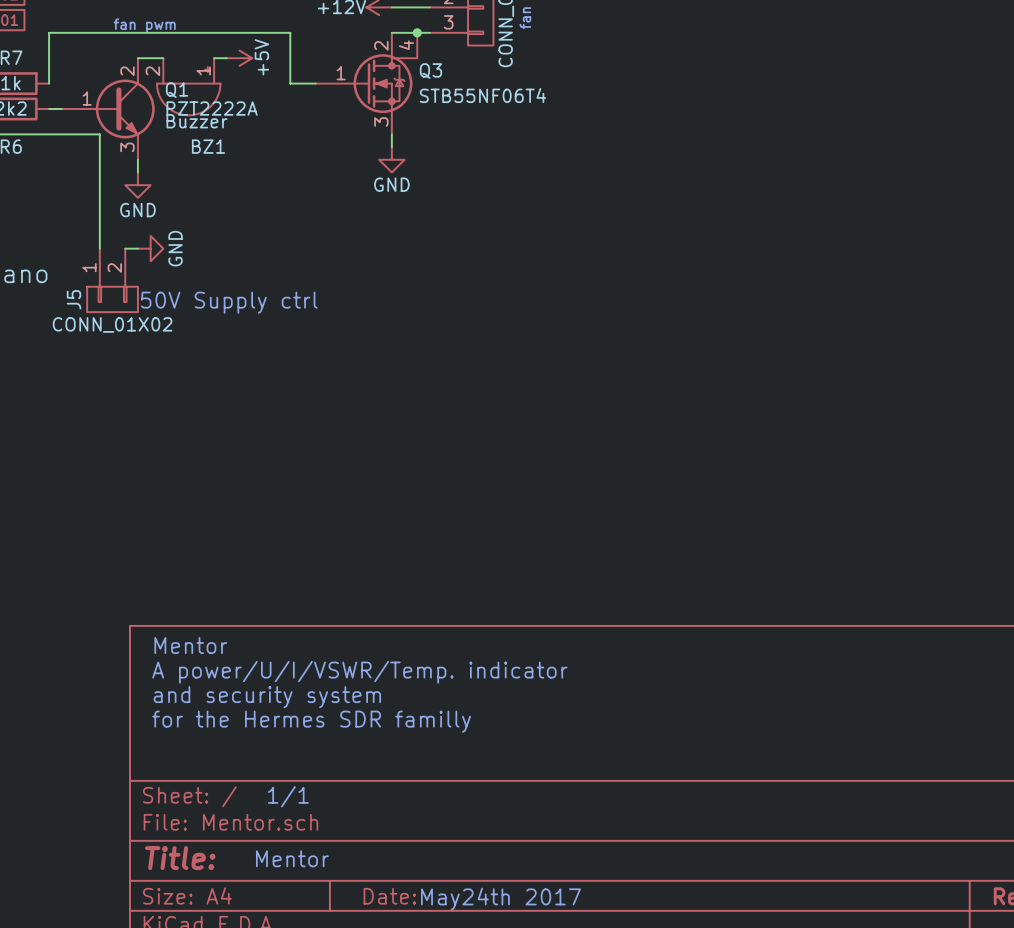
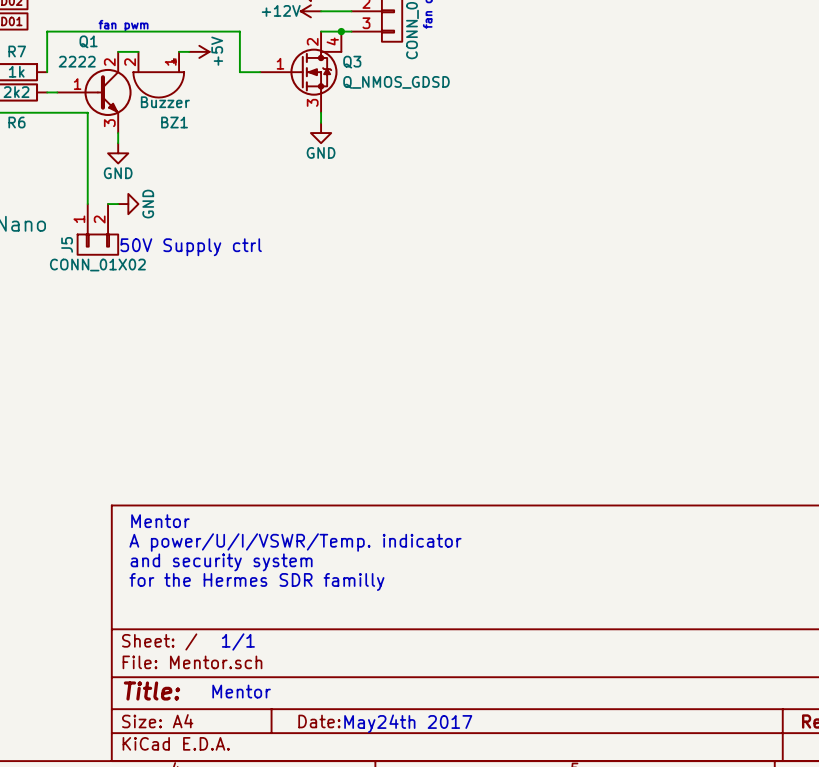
Q1 name position: Q1 (177, 90) -> Q1 (88, 41)
Q3 value: STB55NF06T4 (482, 95) -> Q_NMOS_GDSD (396, 82)
Q1 value: PZT2222A (212, 108) -> 2222 (77, 61)

